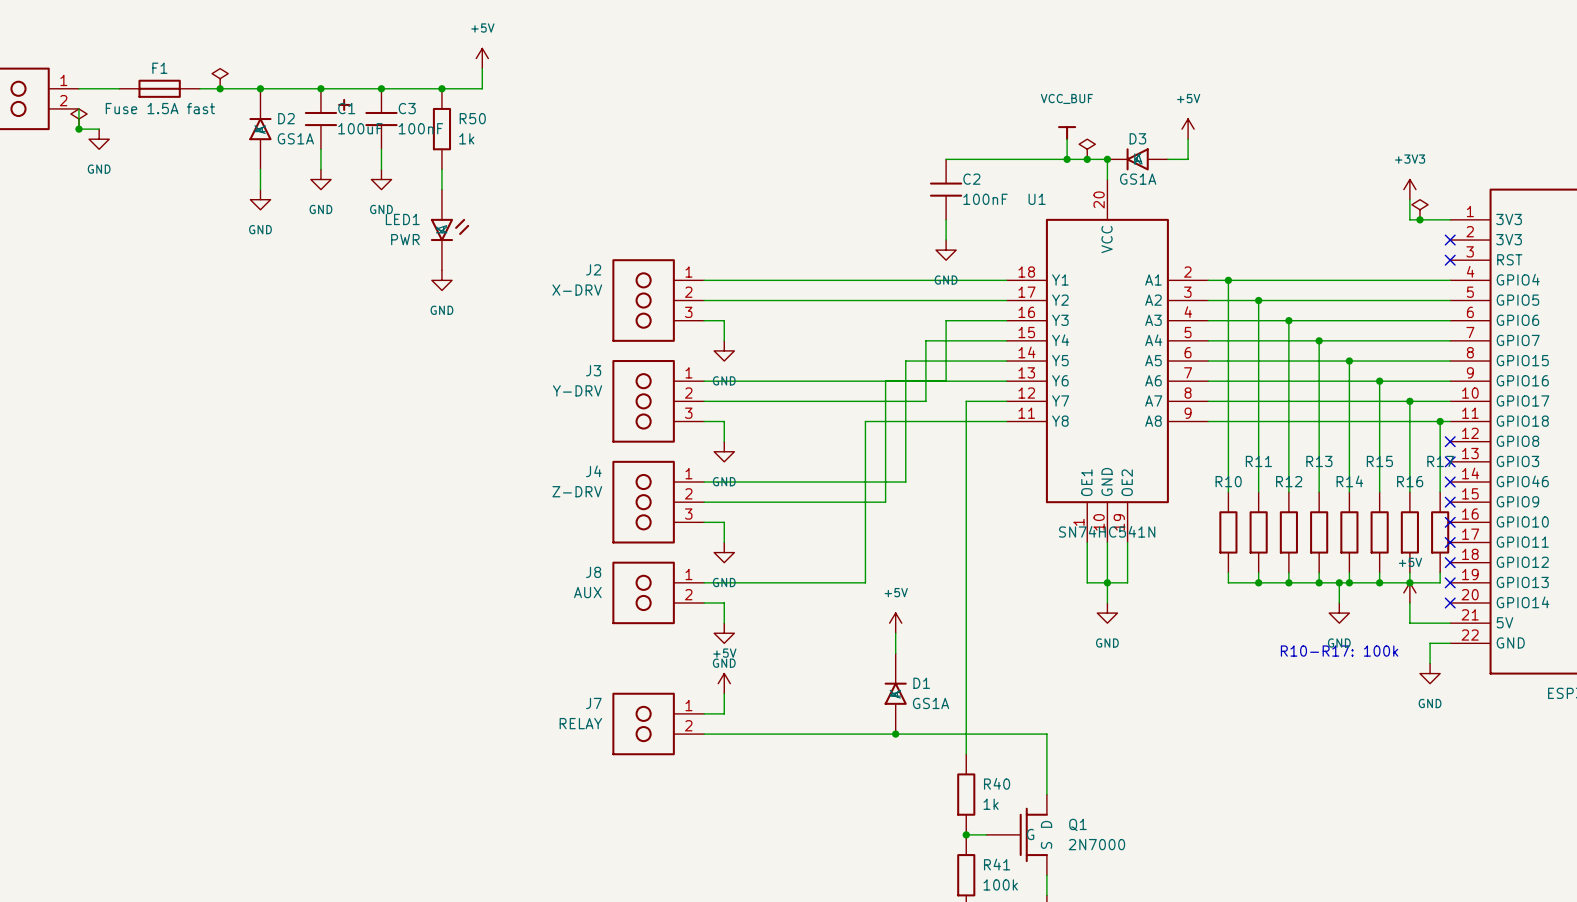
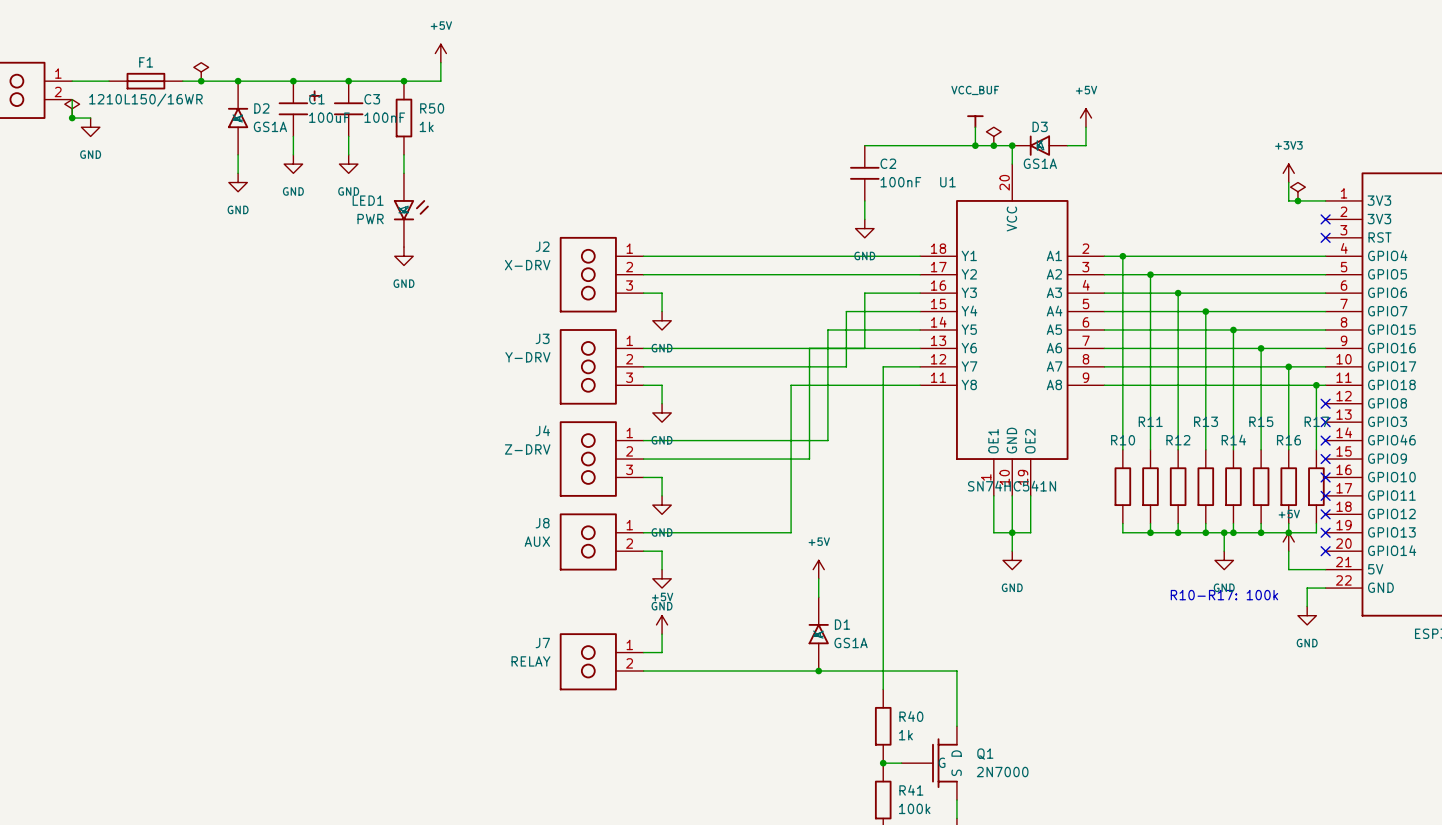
F1 value: Fuse 1.5A fast (160, 108) -> 1210L150/16WR (145, 100)

